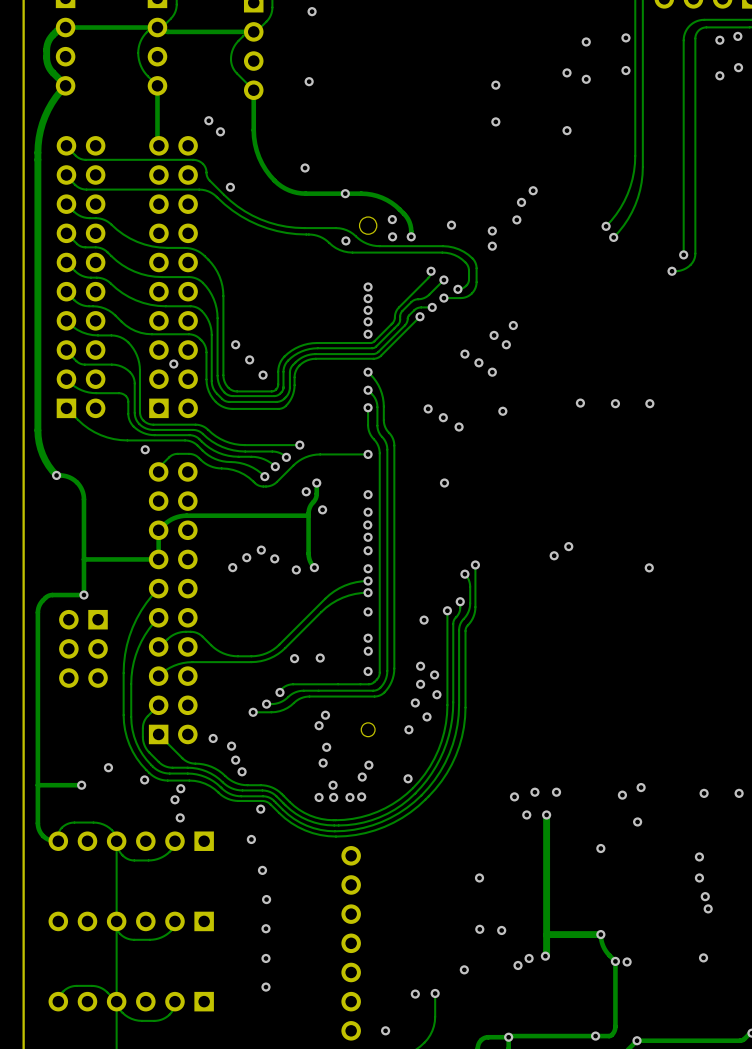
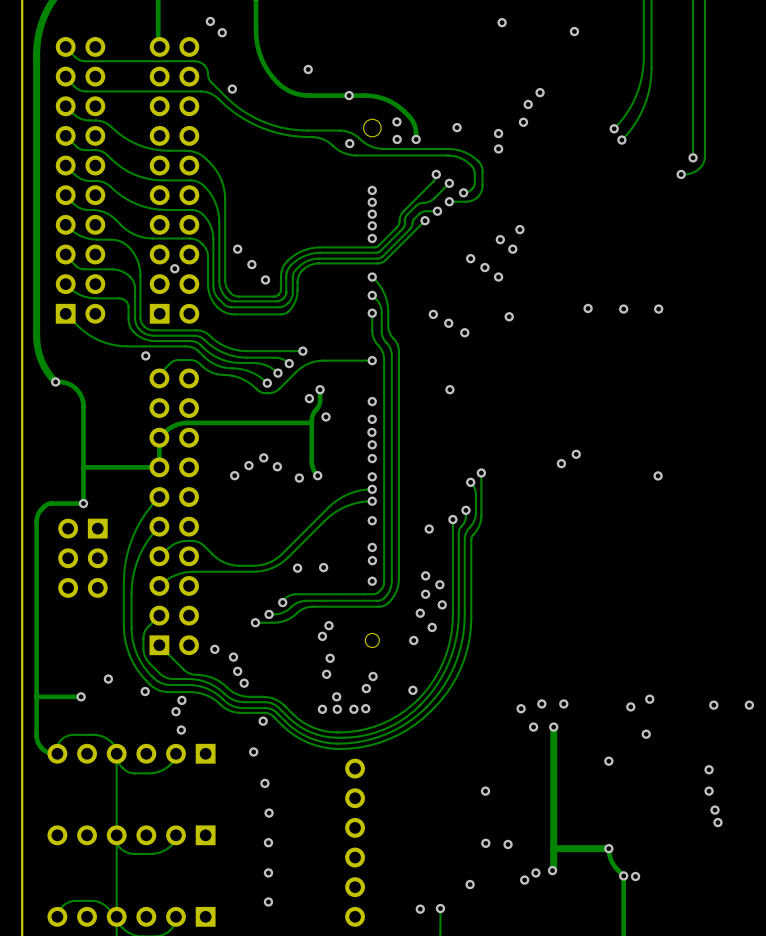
via: (703, 957) -> none

